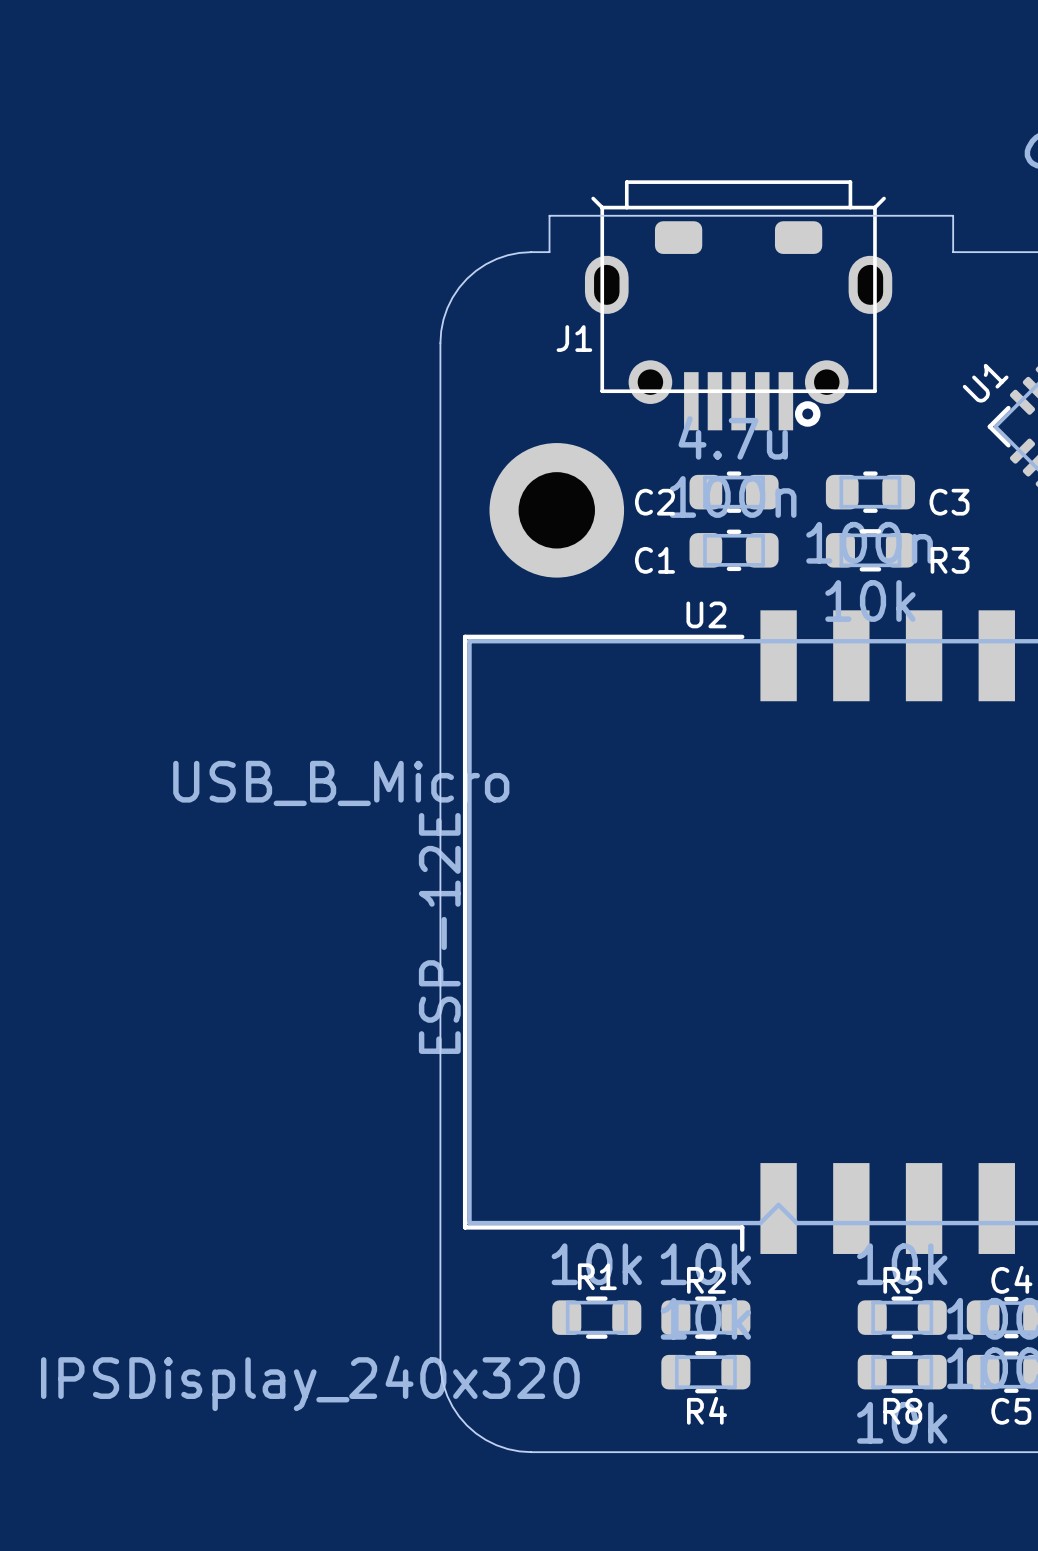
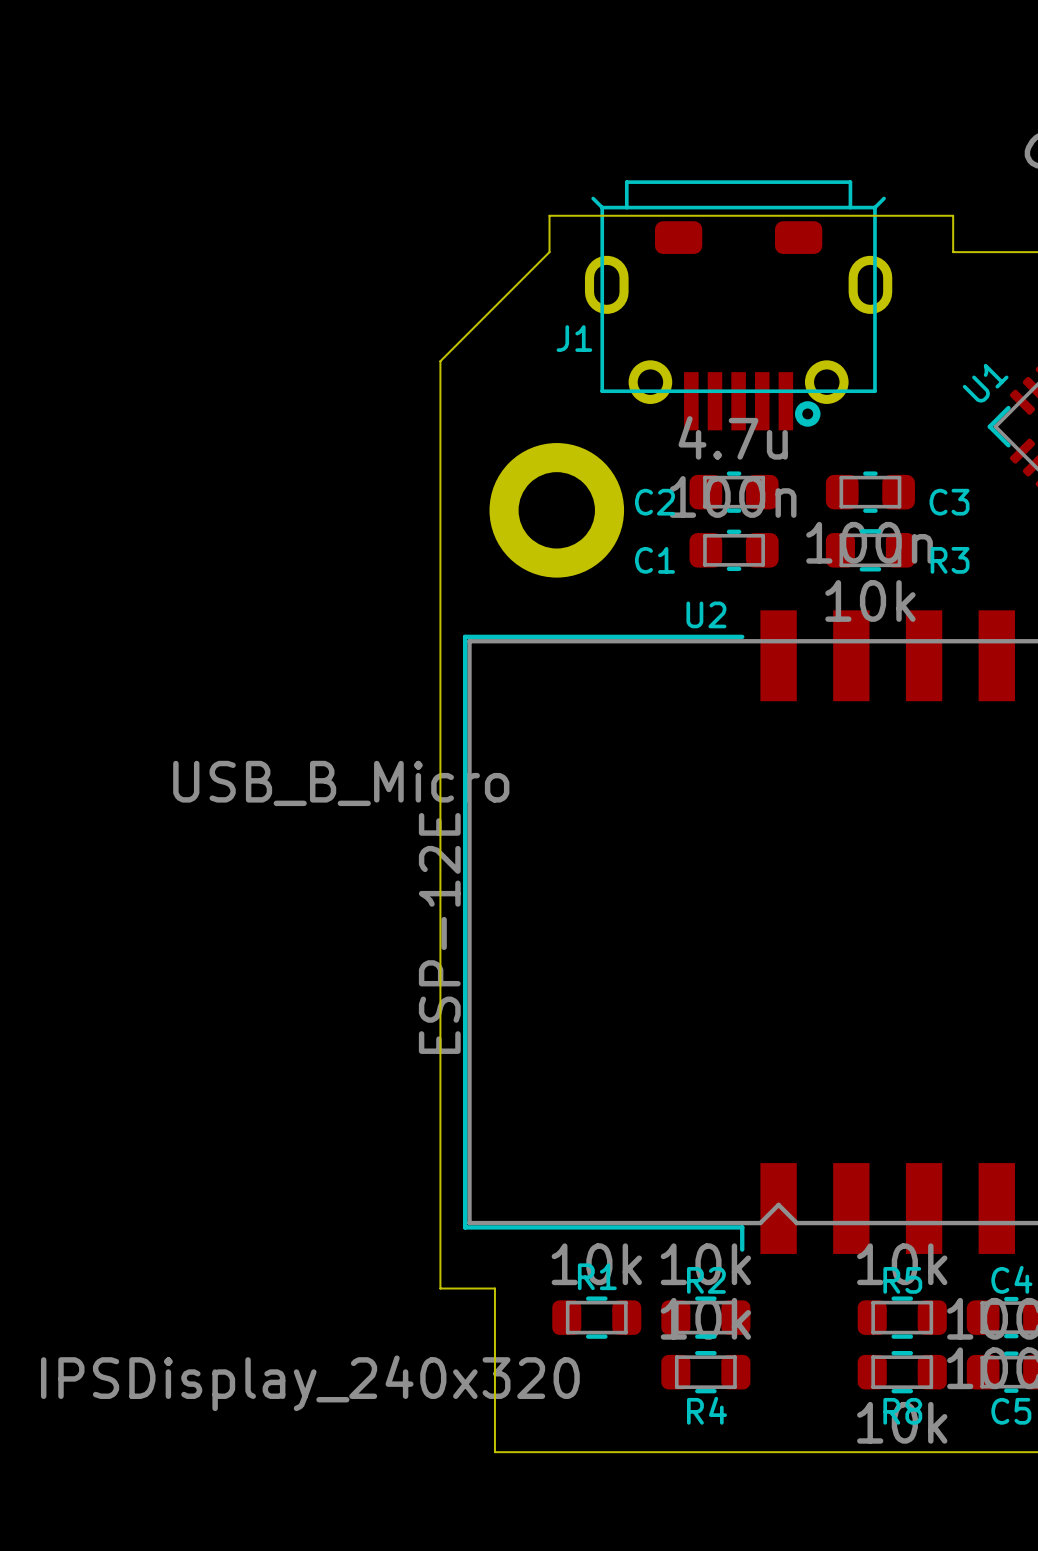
board edge: (549, 252) (507, 255) (485, 264) (467, 278) (452, 297) (443, 319) (440, 361) -> (549, 252) (440, 361)
board edge: (440, 1288) (441, 1373) (443, 1384) (452, 1406) (467, 1425) (485, 1439) (507, 1449) (531, 1452) -> (440, 1288) (494, 1288) (494, 1452) (531, 1452)

